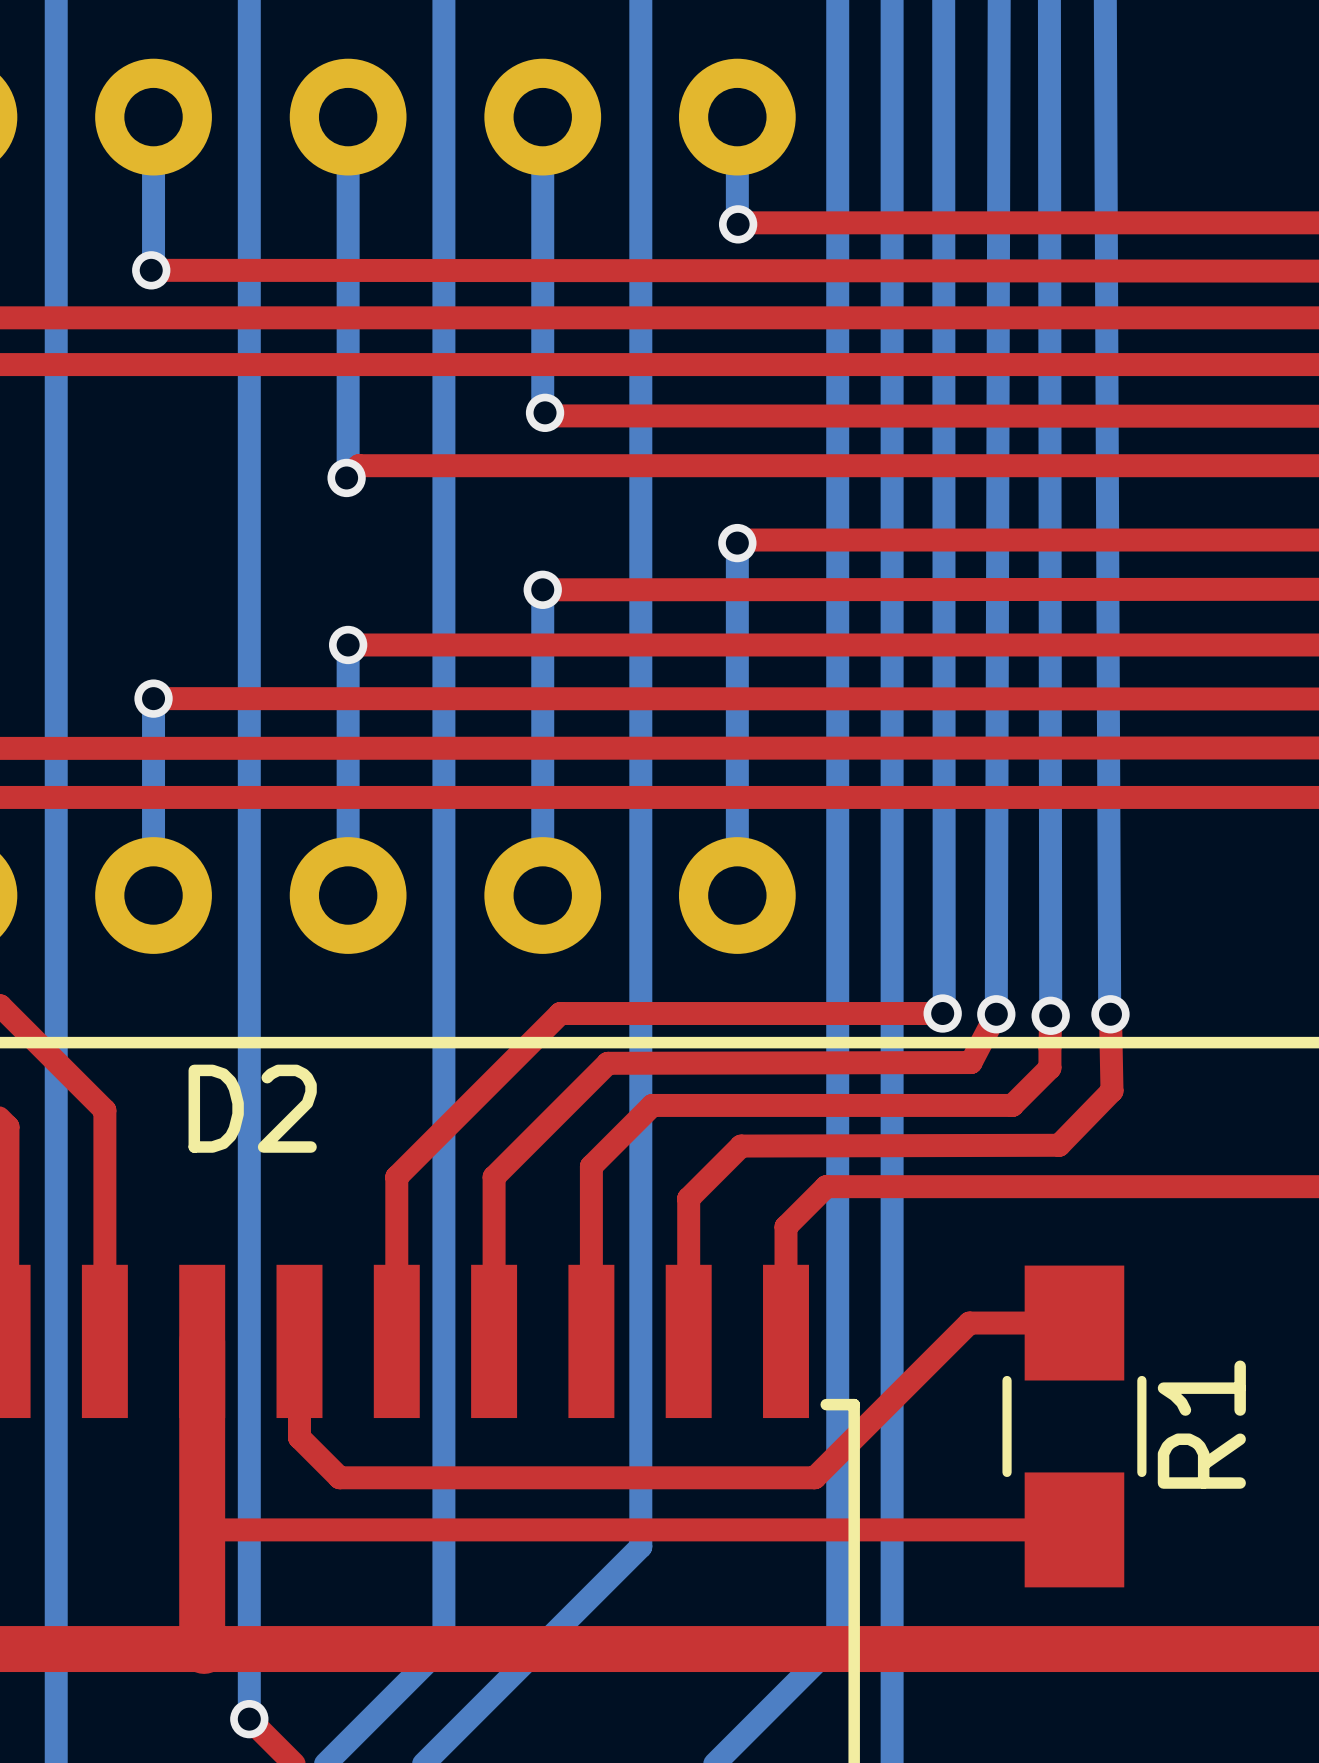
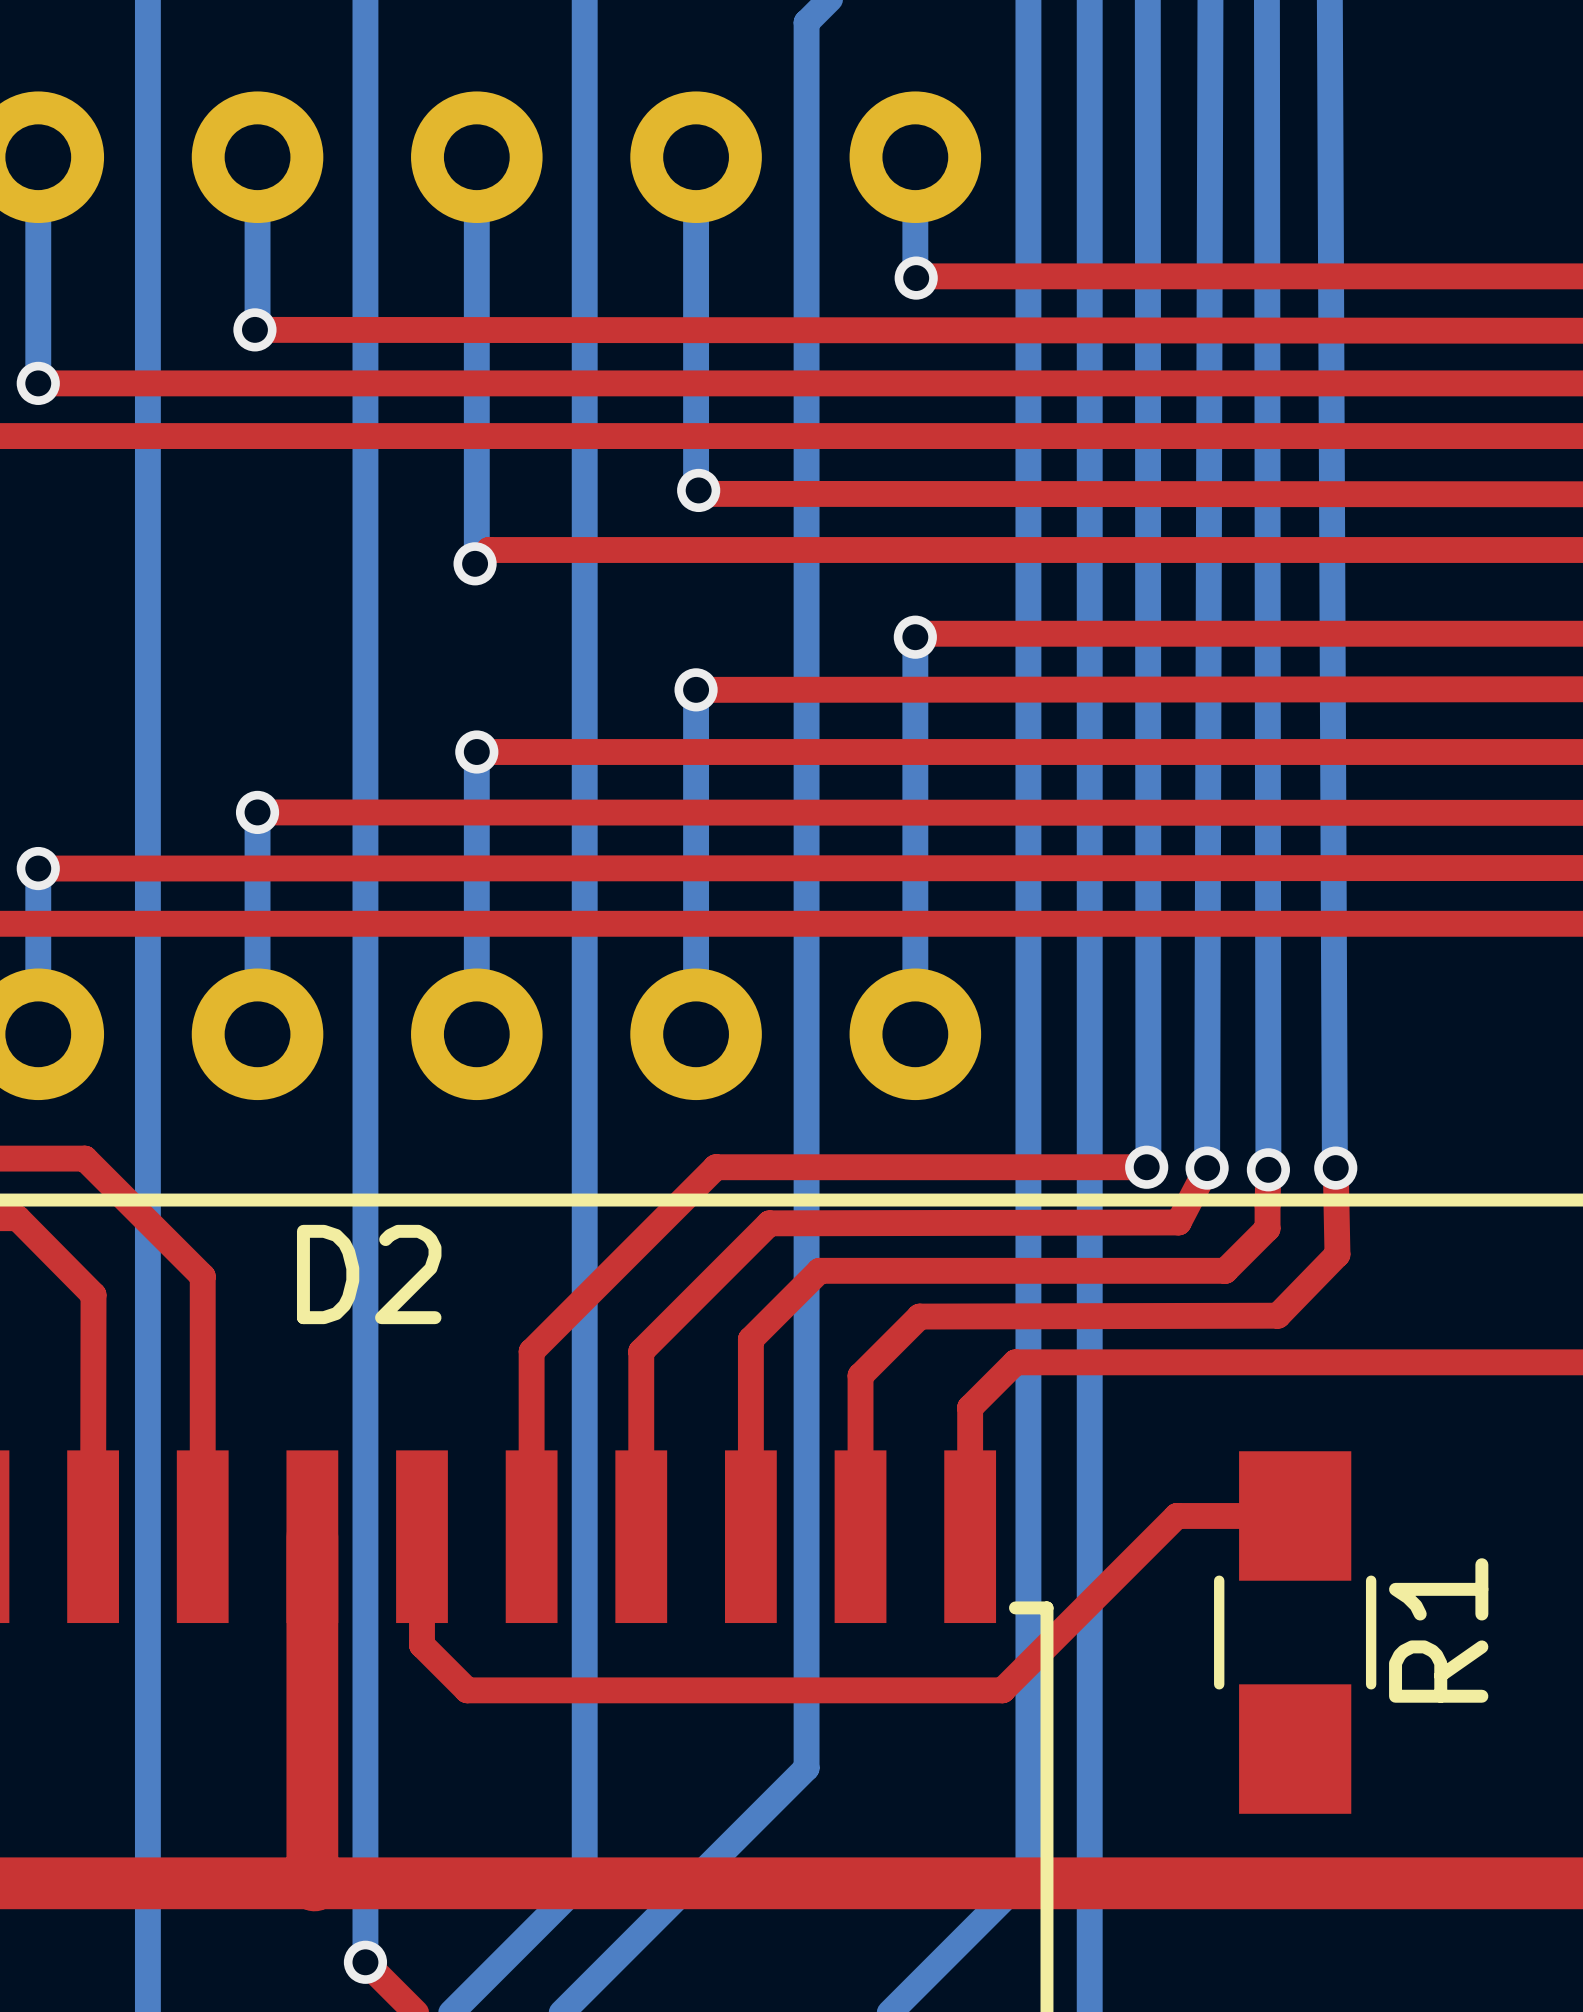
top track: (205, 1529) (1074, 1529) -> none

